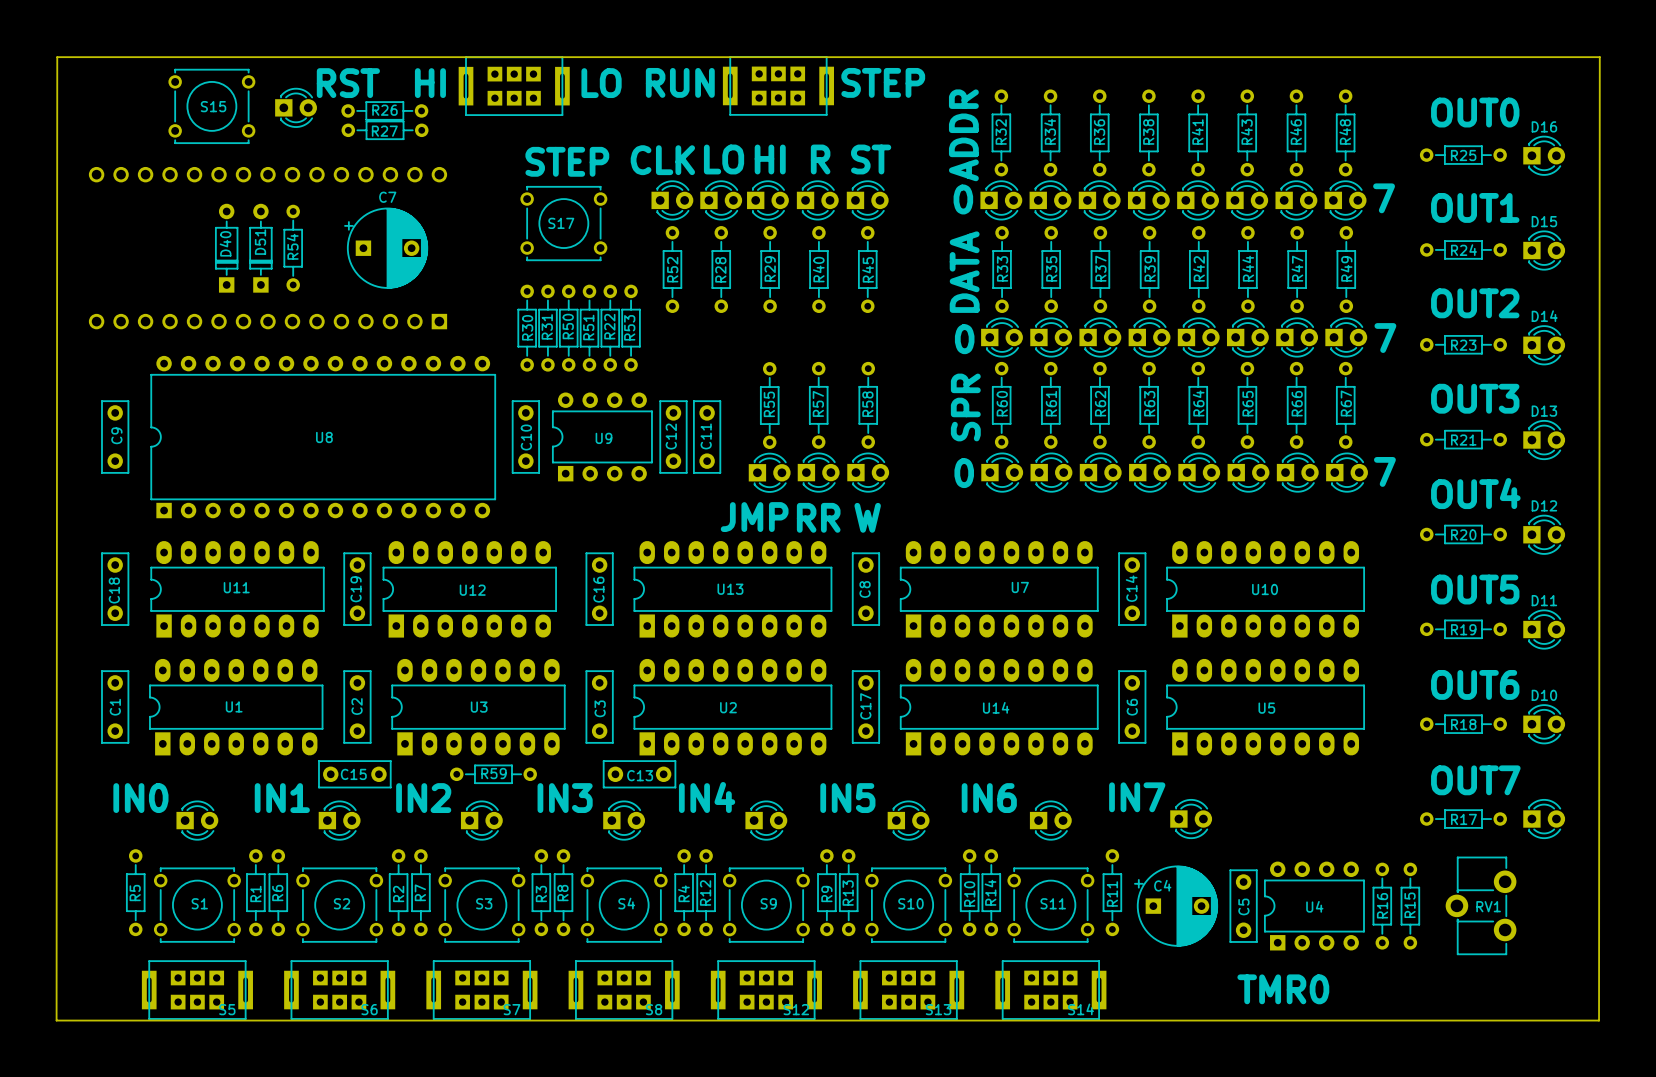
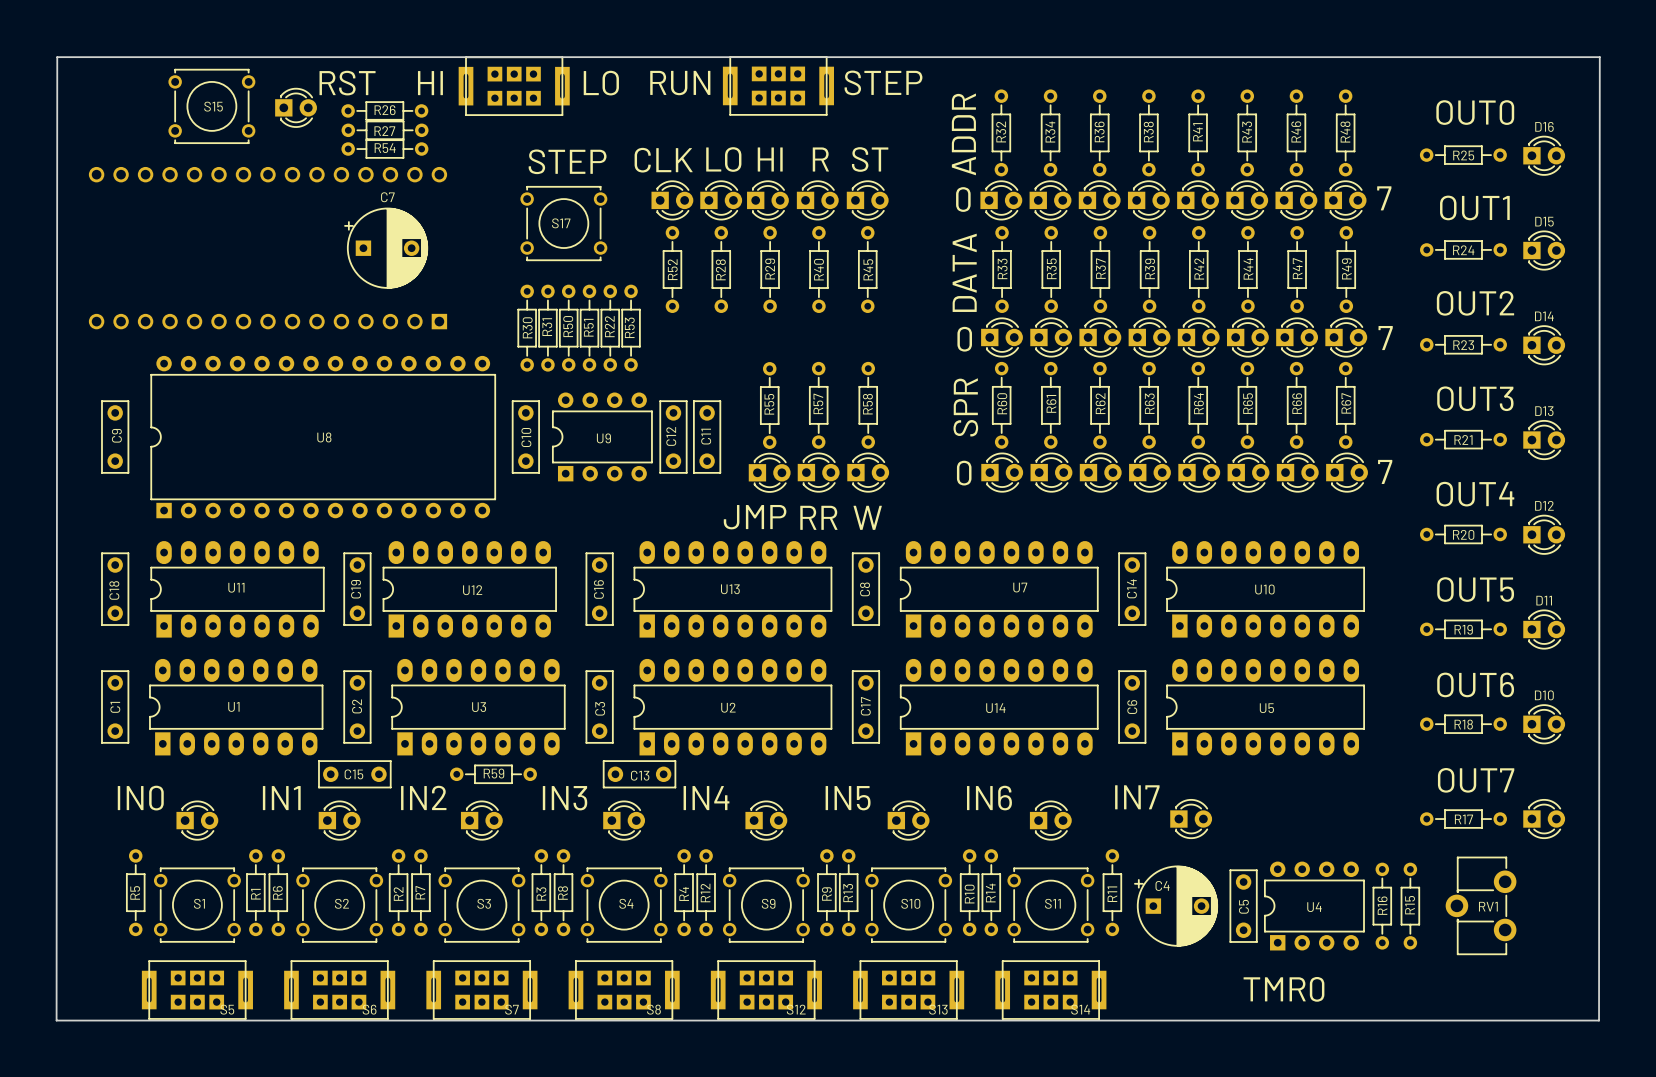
D40: (226, 248) -> none
D51: (260, 248) -> none
R54 rotation: 0° (293, 248) -> 90° clockwise (384, 149)
R54 position: (293, 248) -> (384, 149)

